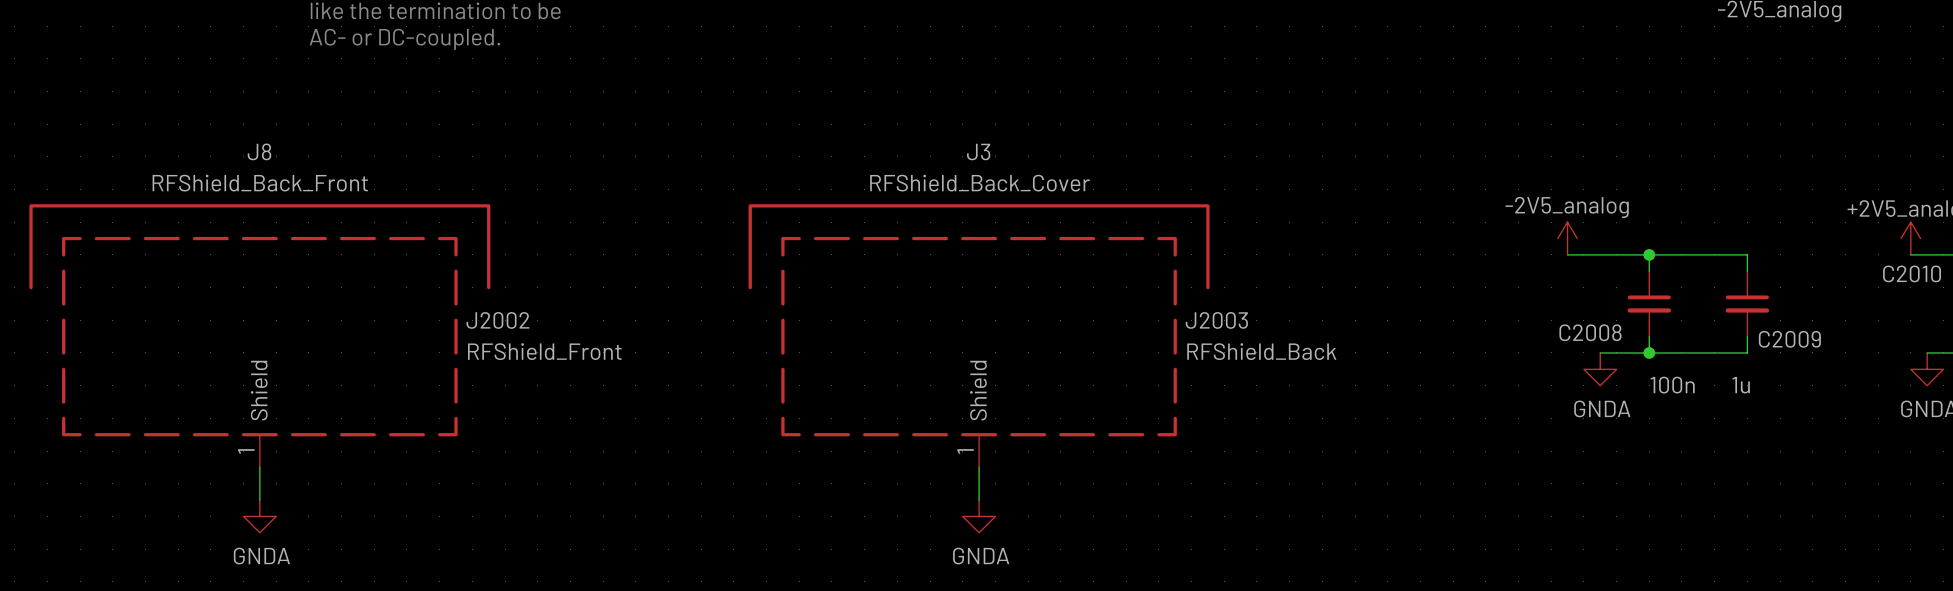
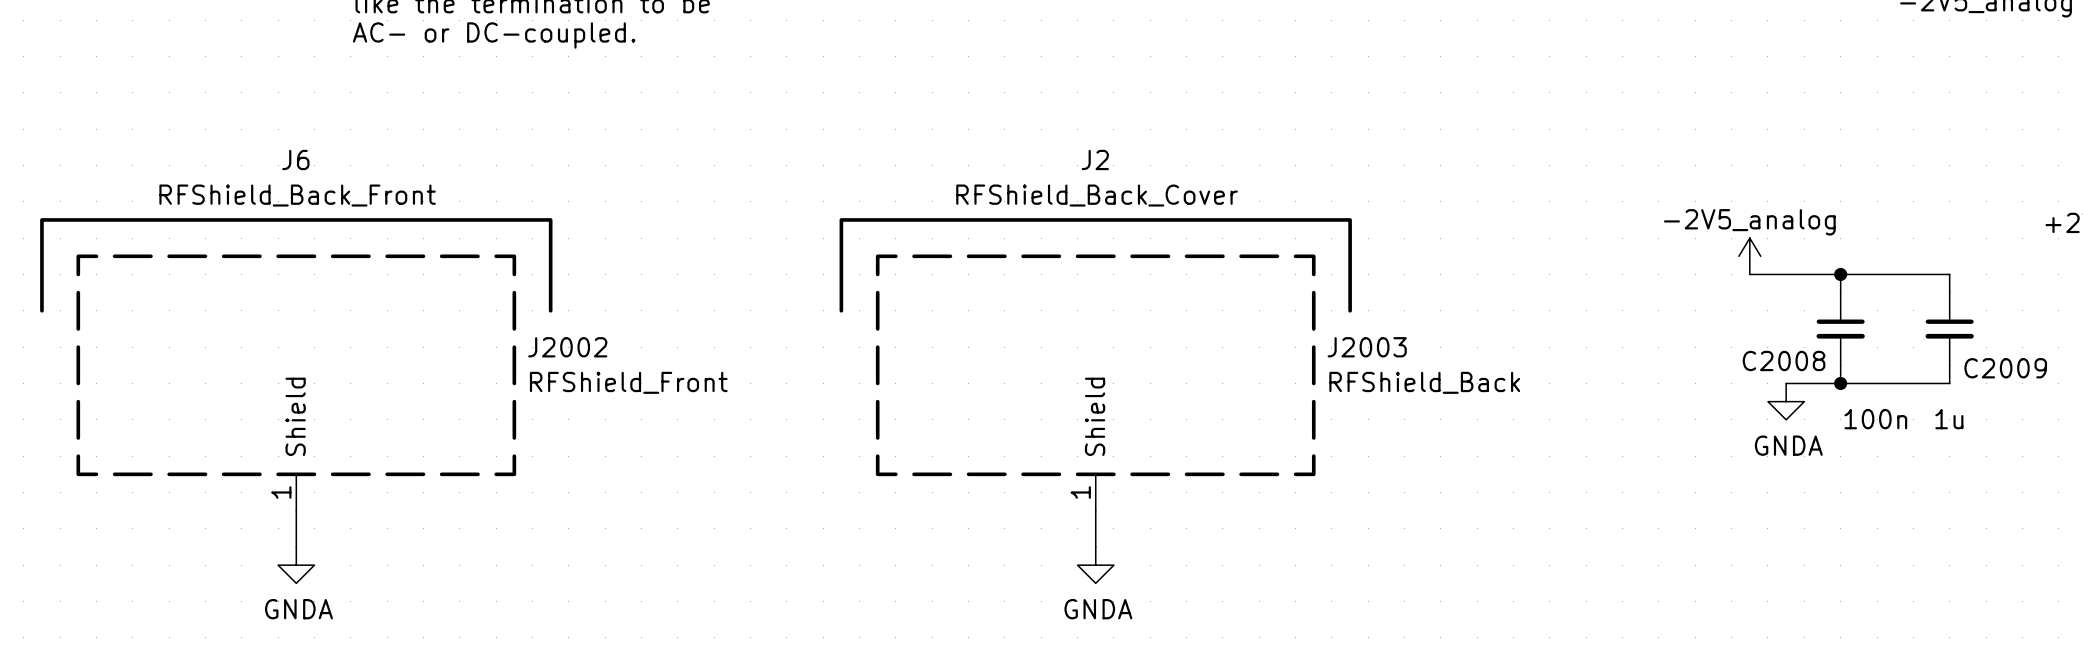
J8 name: J8 (259, 151) -> J6 (295, 159)
J3 name: J3 (978, 152) -> J2 (1095, 159)

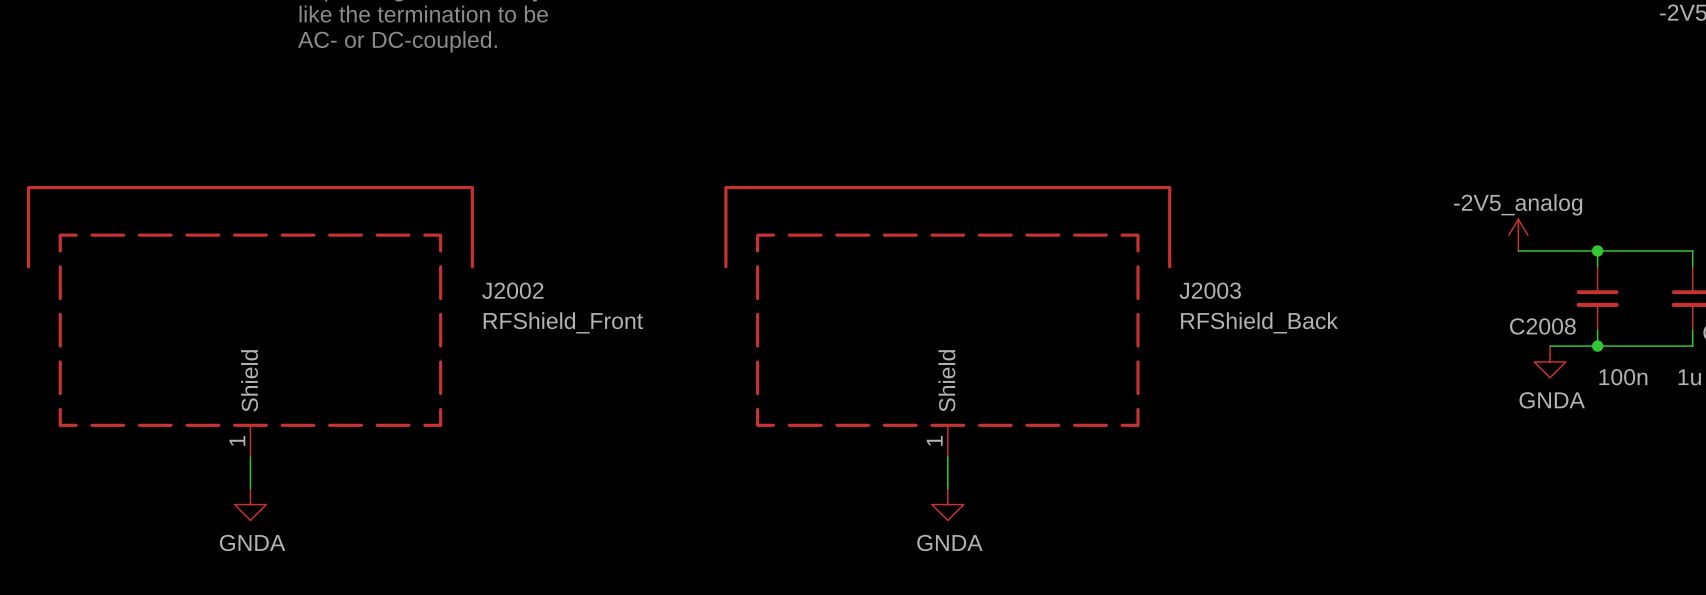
J2002 symbol: [76, 254, 517, 511] -> [26, 186, 474, 458]
J2003 symbol: [875, 254, 1316, 511] -> [724, 186, 1172, 458]
J6: RFShield_Back_Front (296, 265) -> none
J2: RFShield_Back_Cover (1095, 265) -> none
J2002 name position: J2002 (567, 347) -> J2002 (512, 290)
J2003 name position: J2003 (1367, 347) -> J2003 (1210, 290)
J2002 value position: RFShield_Front (628, 382) -> RFShield_Front (563, 322)
J2003 value position: RFShield_Back (1424, 382) -> RFShield_Back (1259, 322)

